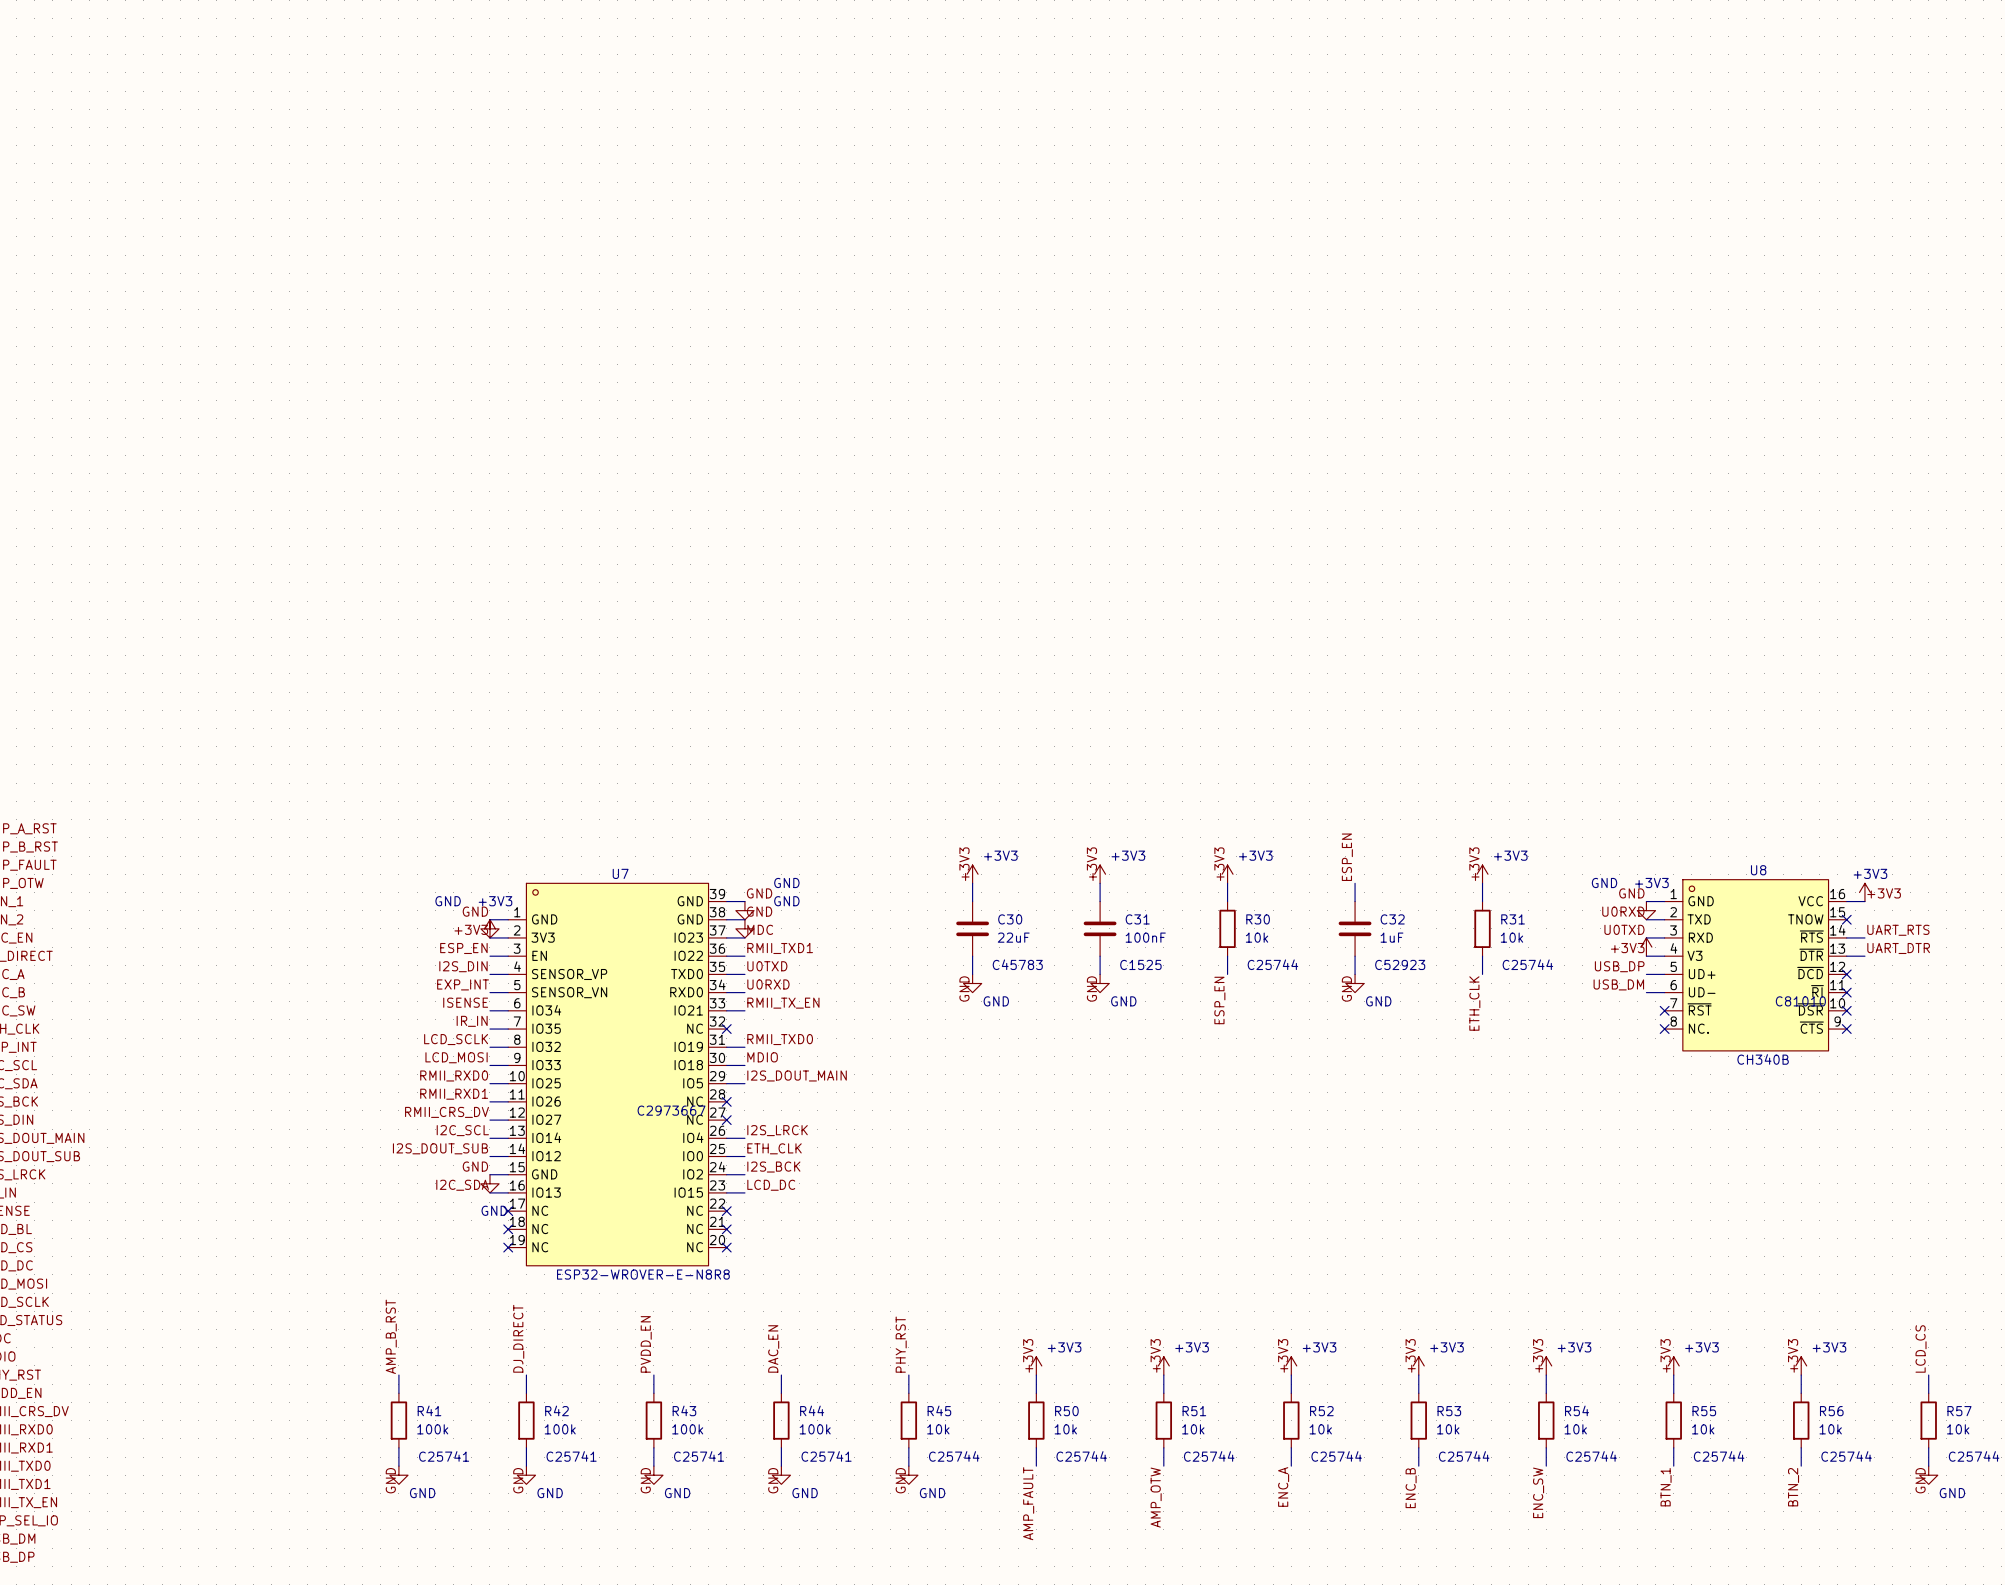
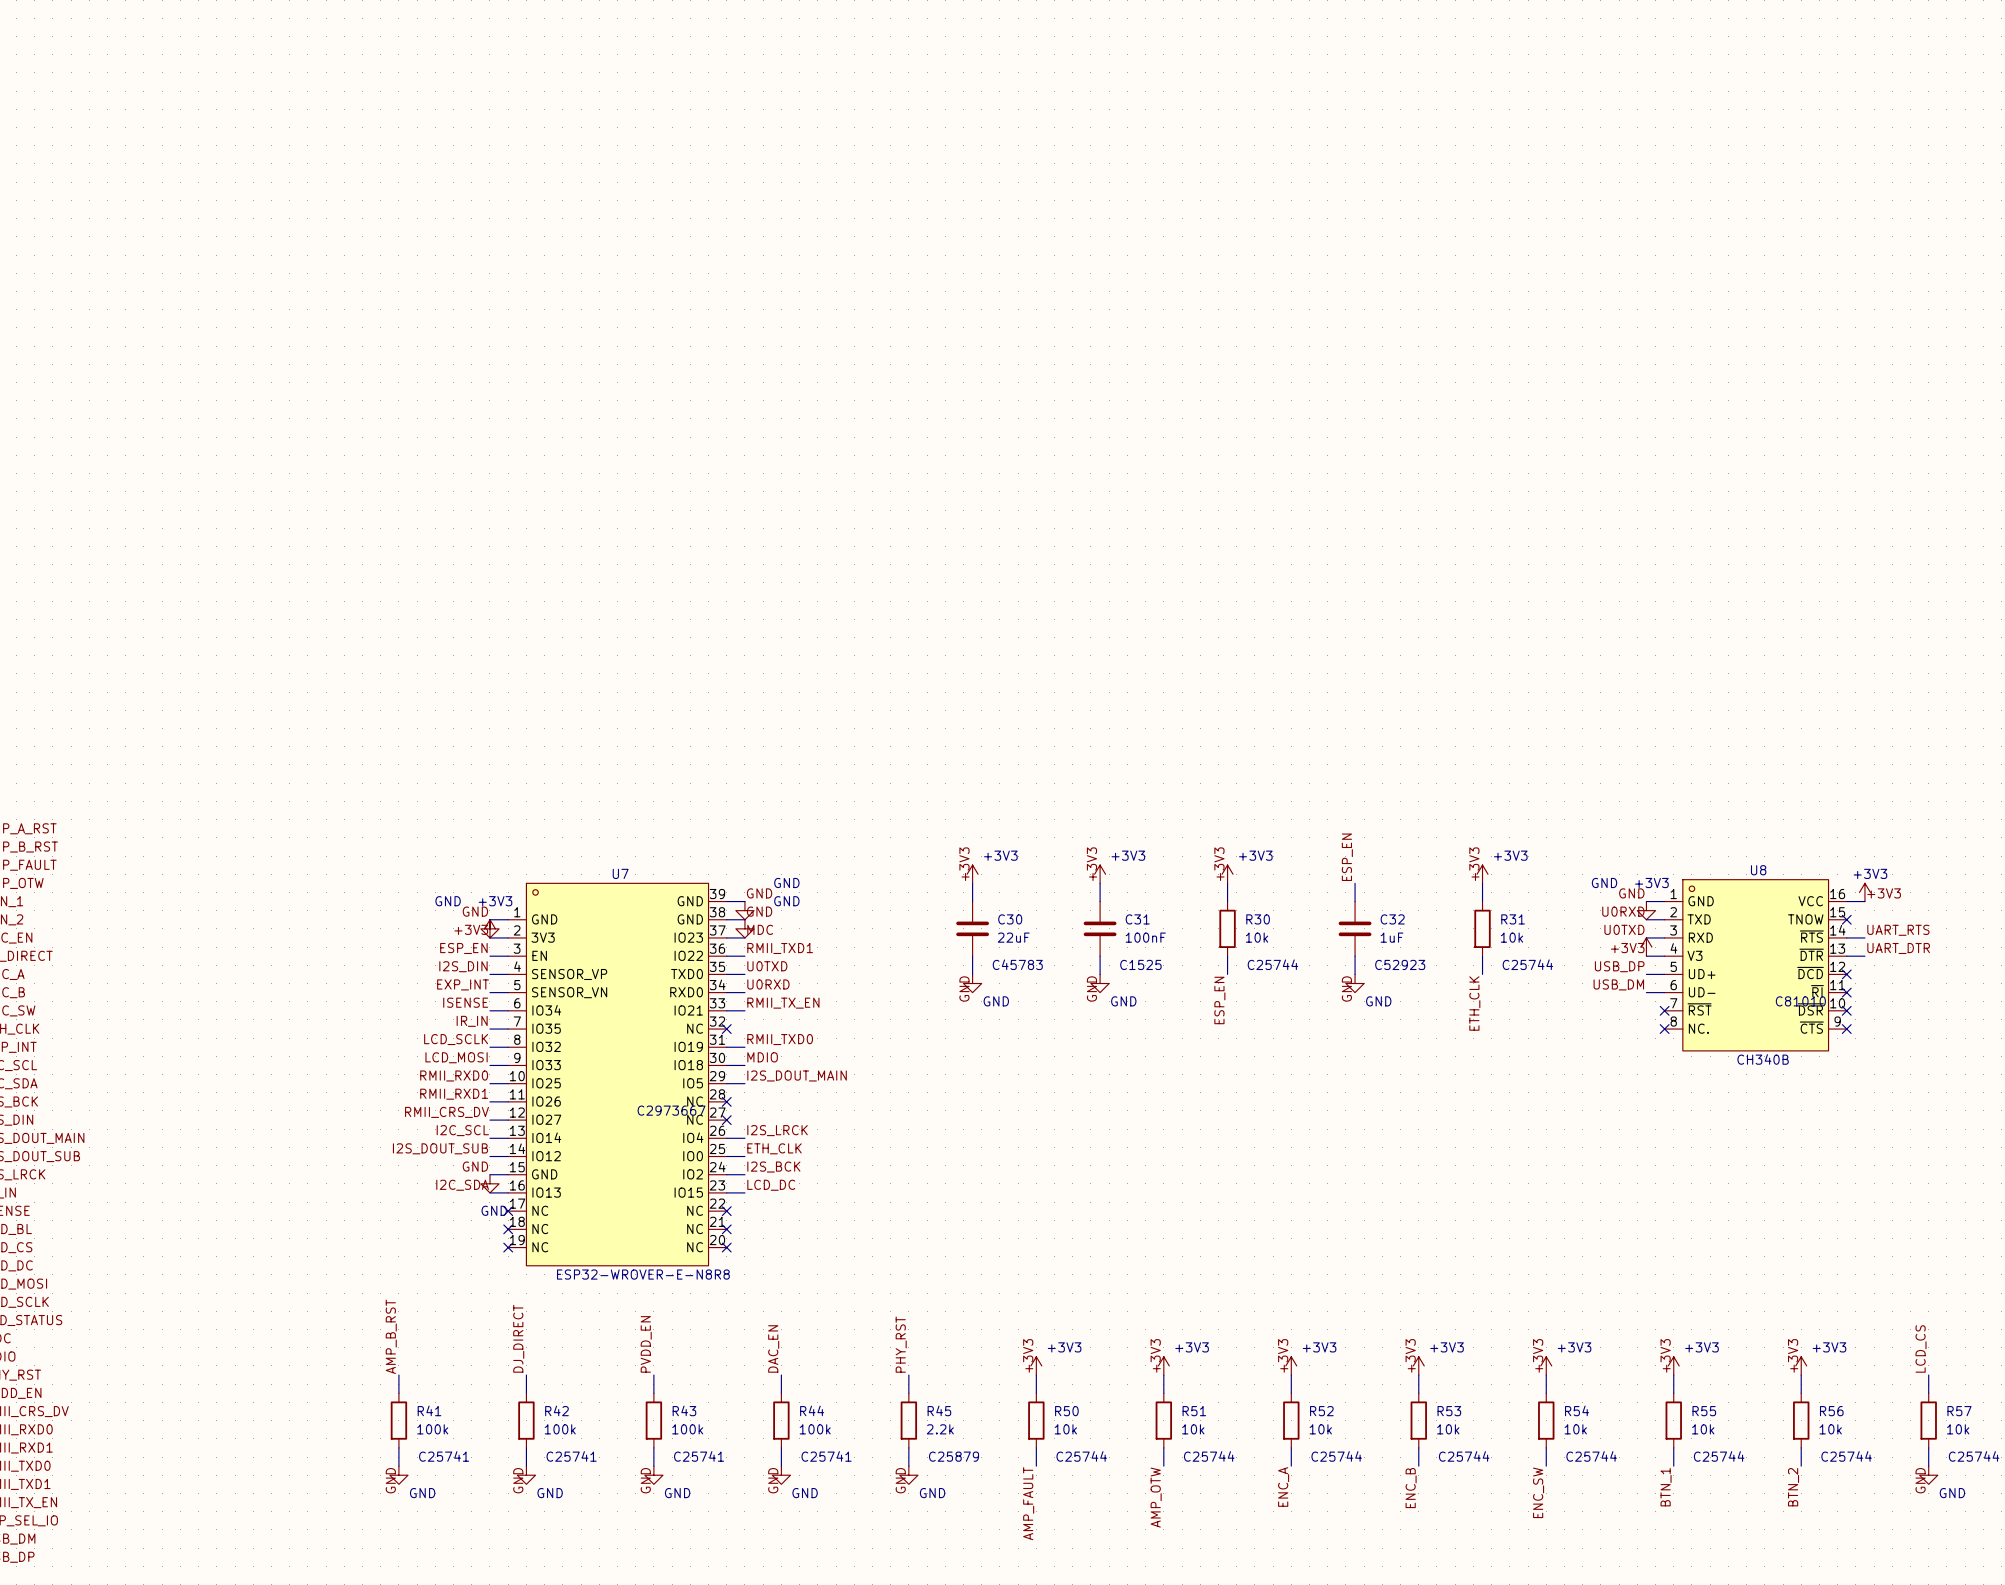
R45 value: 10k (938, 1429) -> 2.2k (940, 1429)
R45 text: C25744 (954, 1456) -> C25879 (954, 1456)

